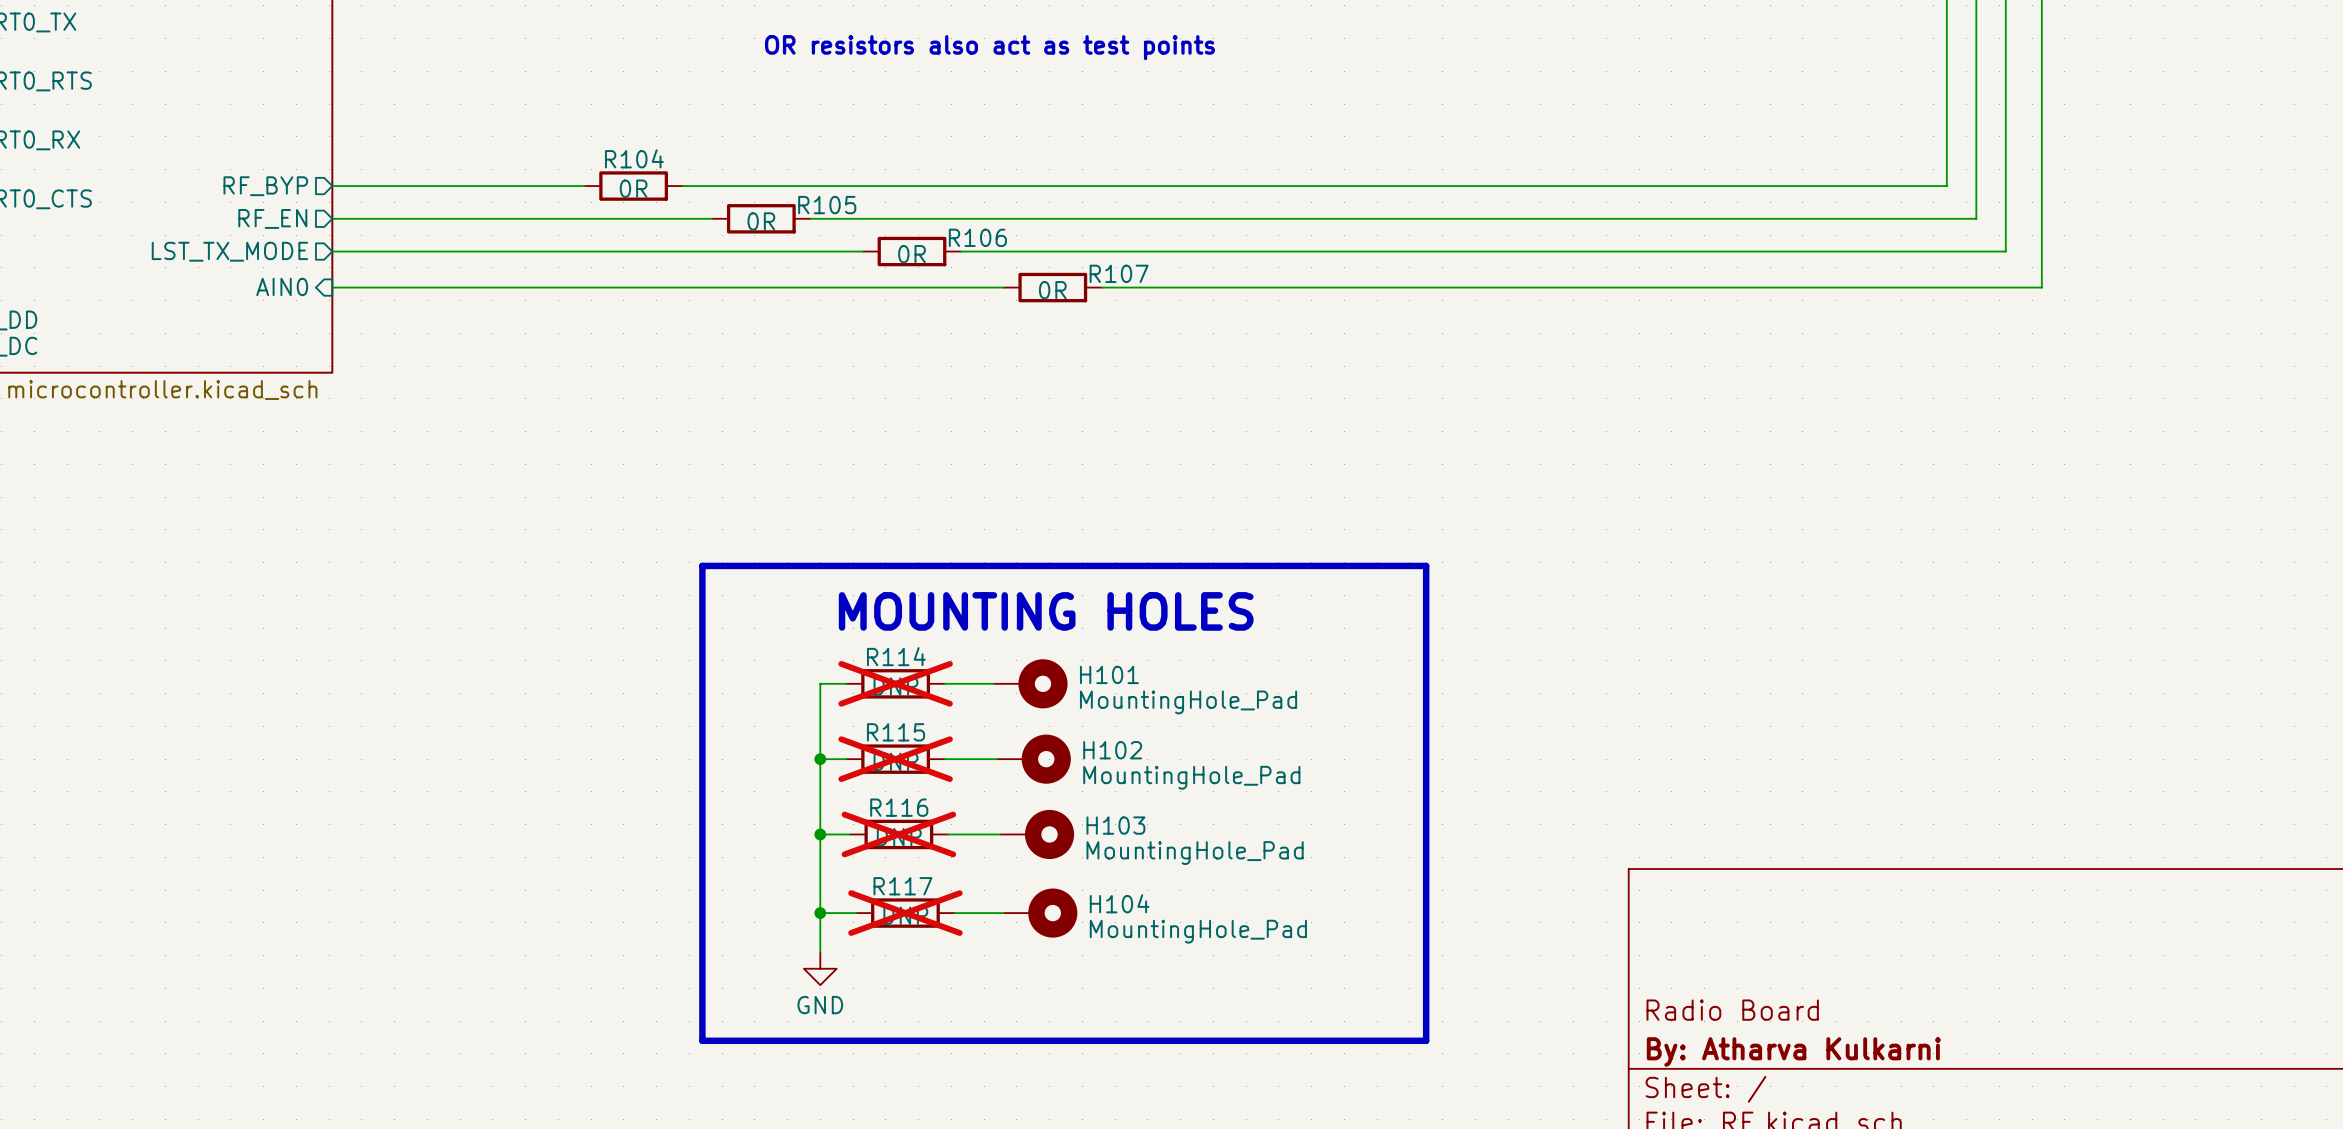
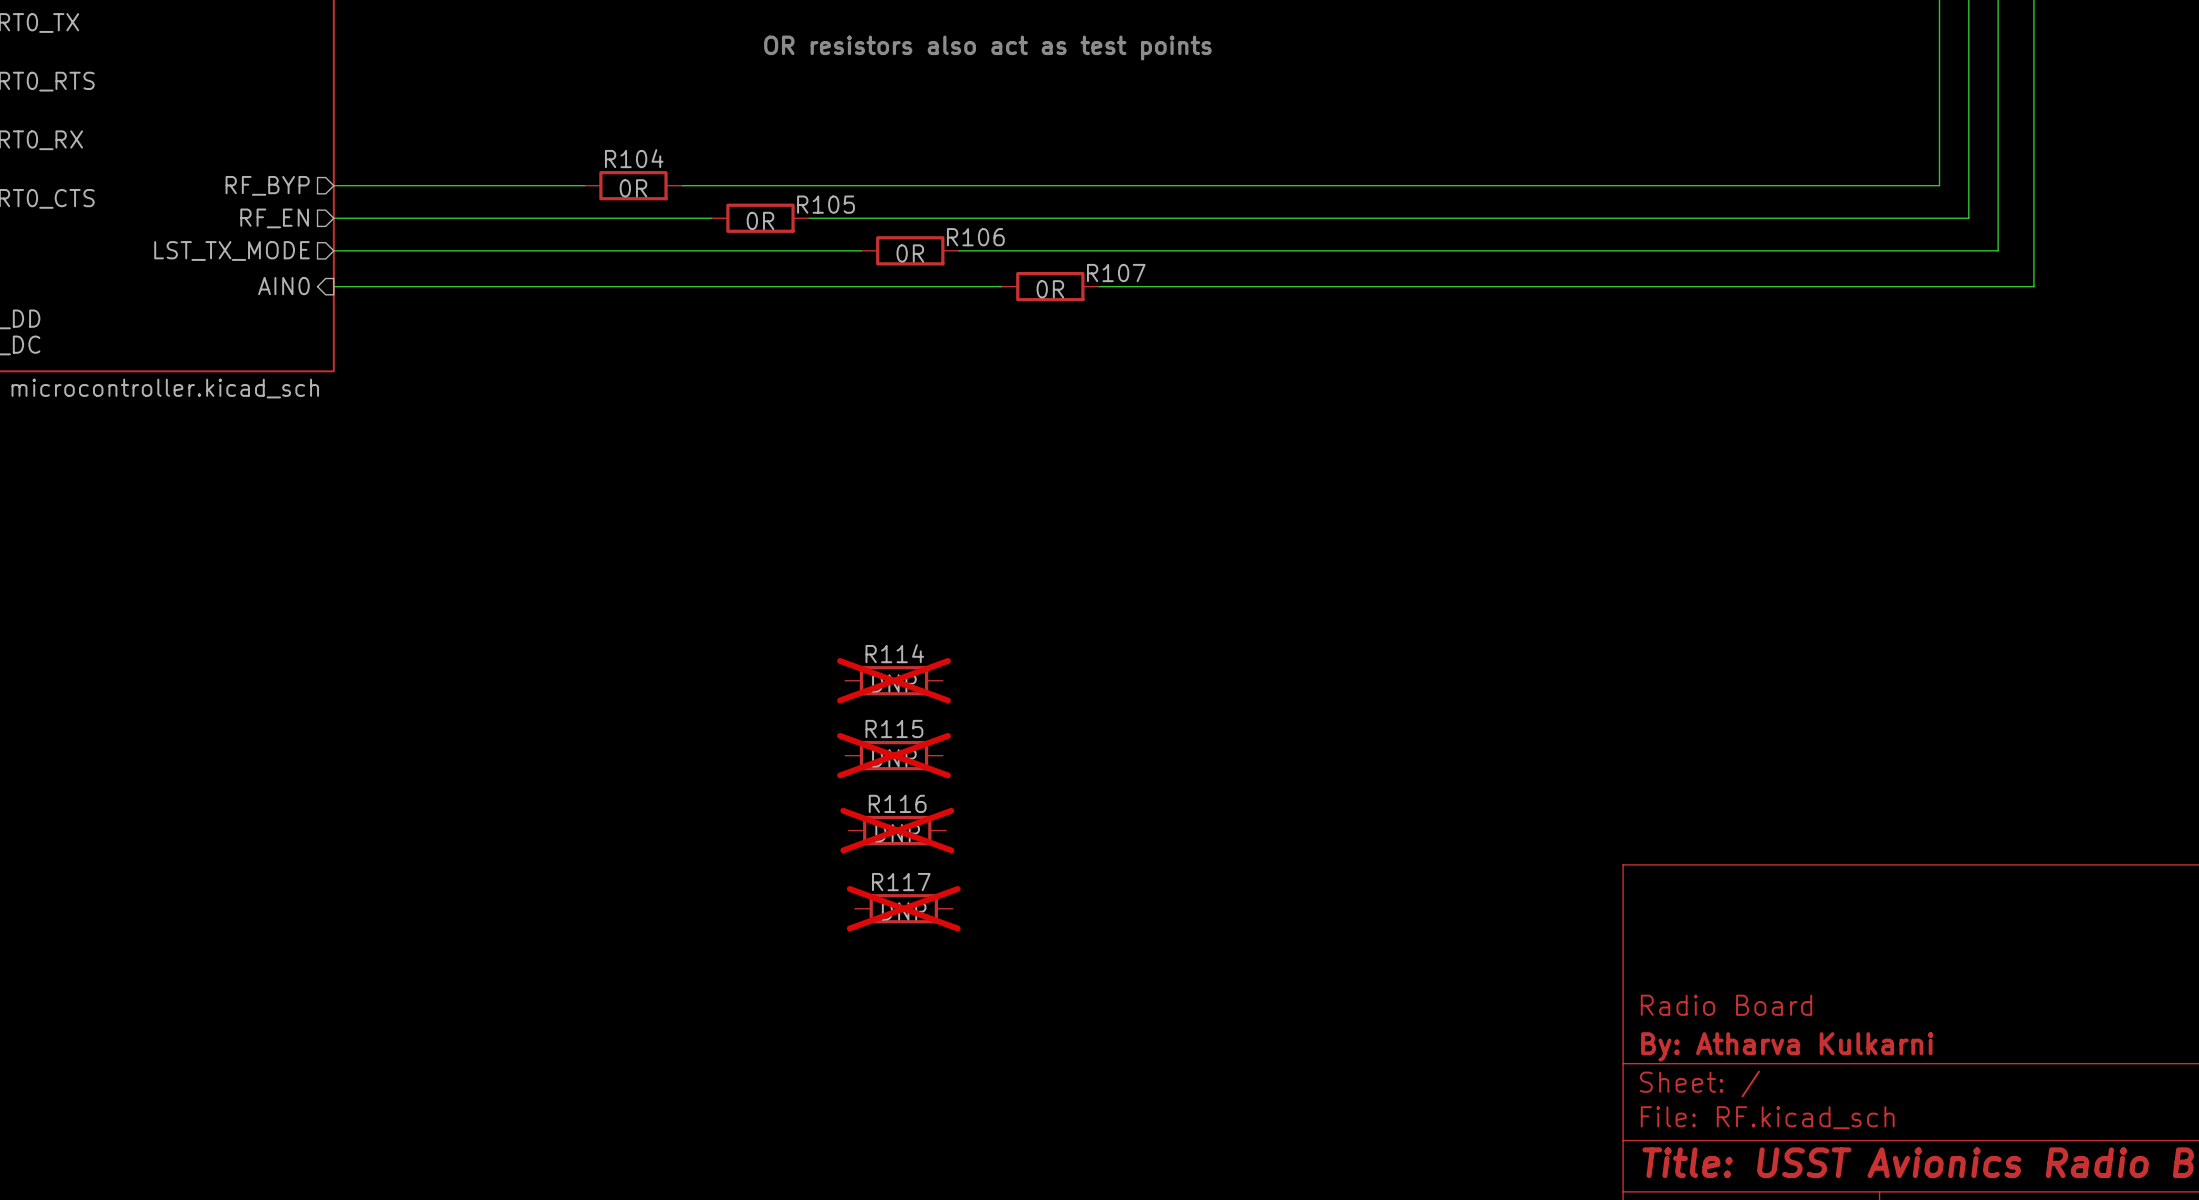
line: (702, 565) (1426, 565) (1426, 1040) (702, 1040) (702, 565) -> none
text: MOUNTING HOLES (1046, 611) -> none
wire: (846, 683) (820, 683) (820, 952) -> none
wire: (944, 683) (993, 683) -> none
H101: MountingHole_Pad (1030, 683) -> none
wire: (820, 759) (846, 759) -> none
junction: (820, 759) -> none
wire: (944, 759) (997, 759) -> none
H102: MountingHole_Pad (1033, 759) -> none
wire: (820, 834) (849, 834) -> none
junction: (820, 834) -> none
wire: (948, 834) (1000, 834) -> none
H103: MountingHole_Pad (1037, 834) -> none
wire: (820, 913) (856, 913) -> none
junction: (820, 913) -> none
wire: (954, 913) (1003, 913) -> none
H104: MountingHole_Pad (1040, 913) -> none
power symbol: GND (820, 968) -> none

